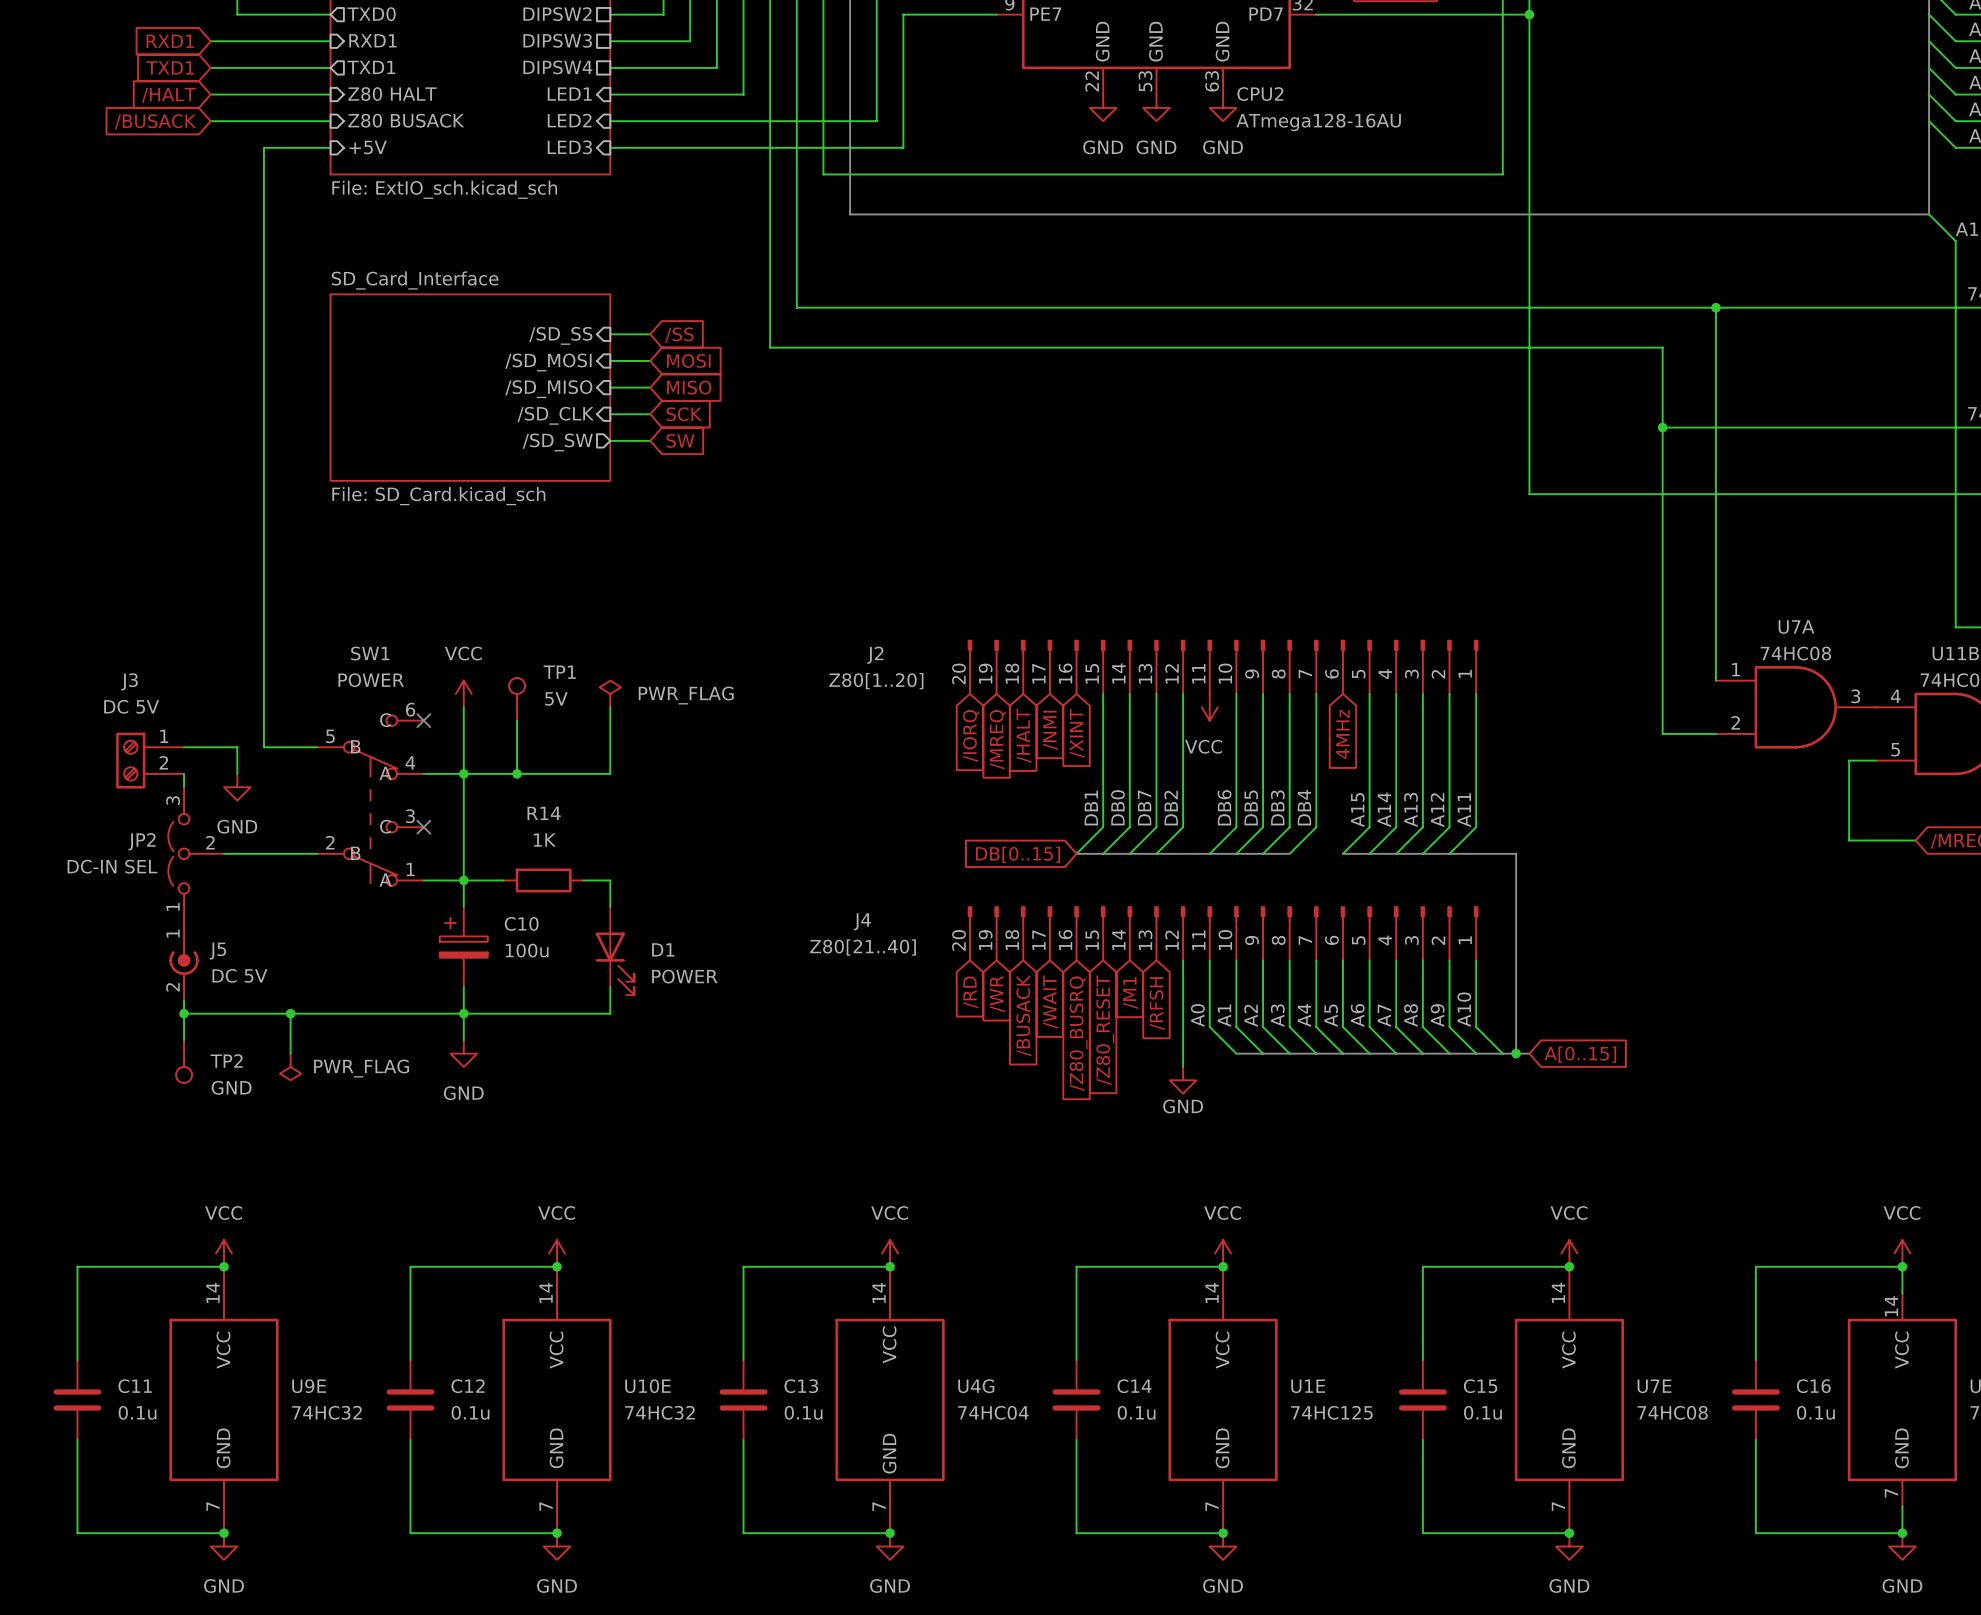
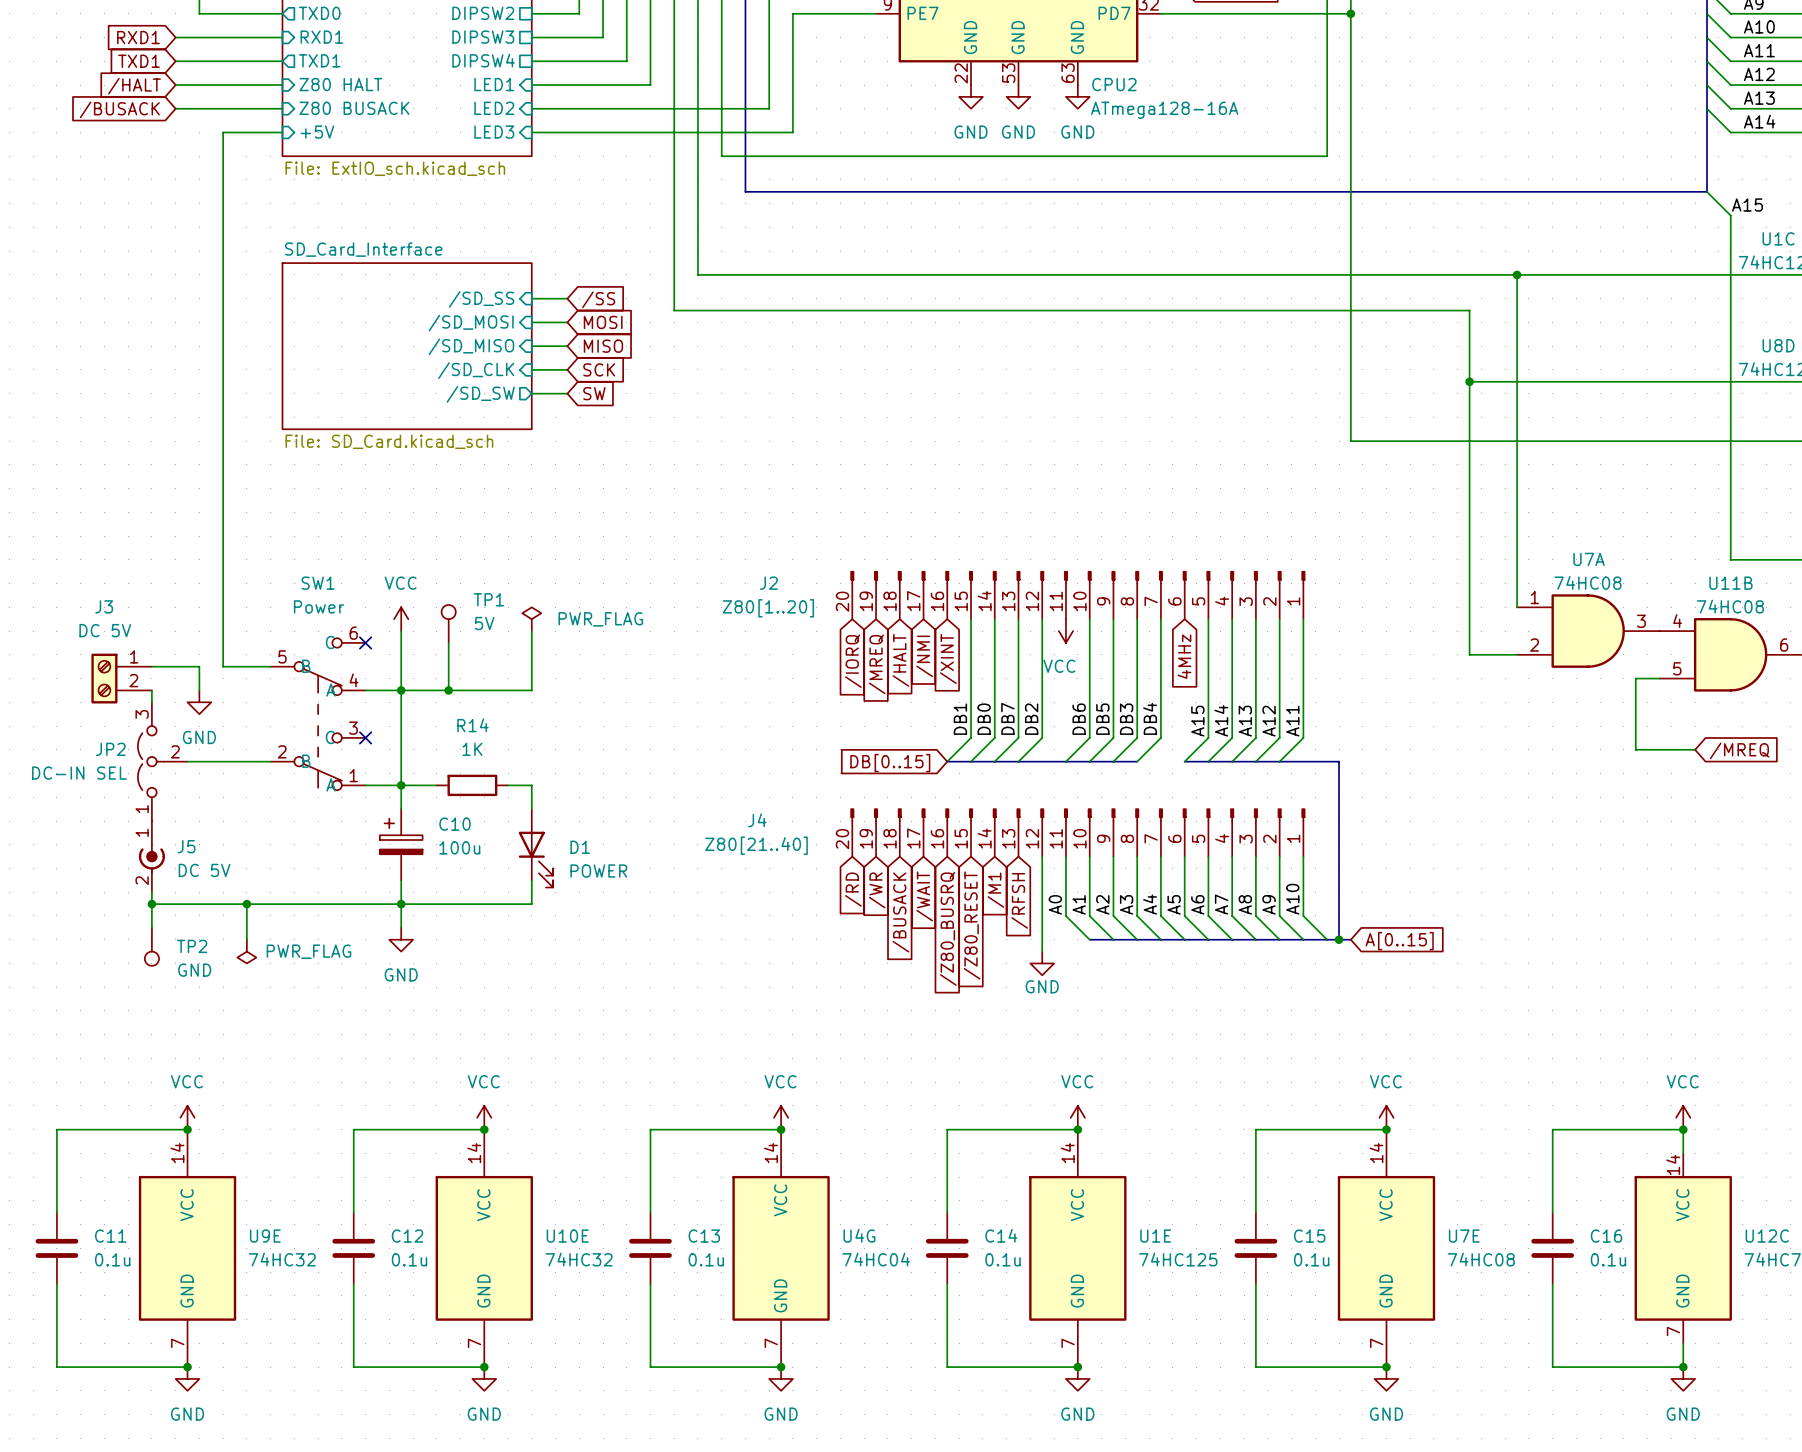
CPU2 value: ATmega128-16AU (1318, 122) -> ATmega128-16A (1164, 110)
SW1 value: POWER (371, 680) -> Power (318, 606)

